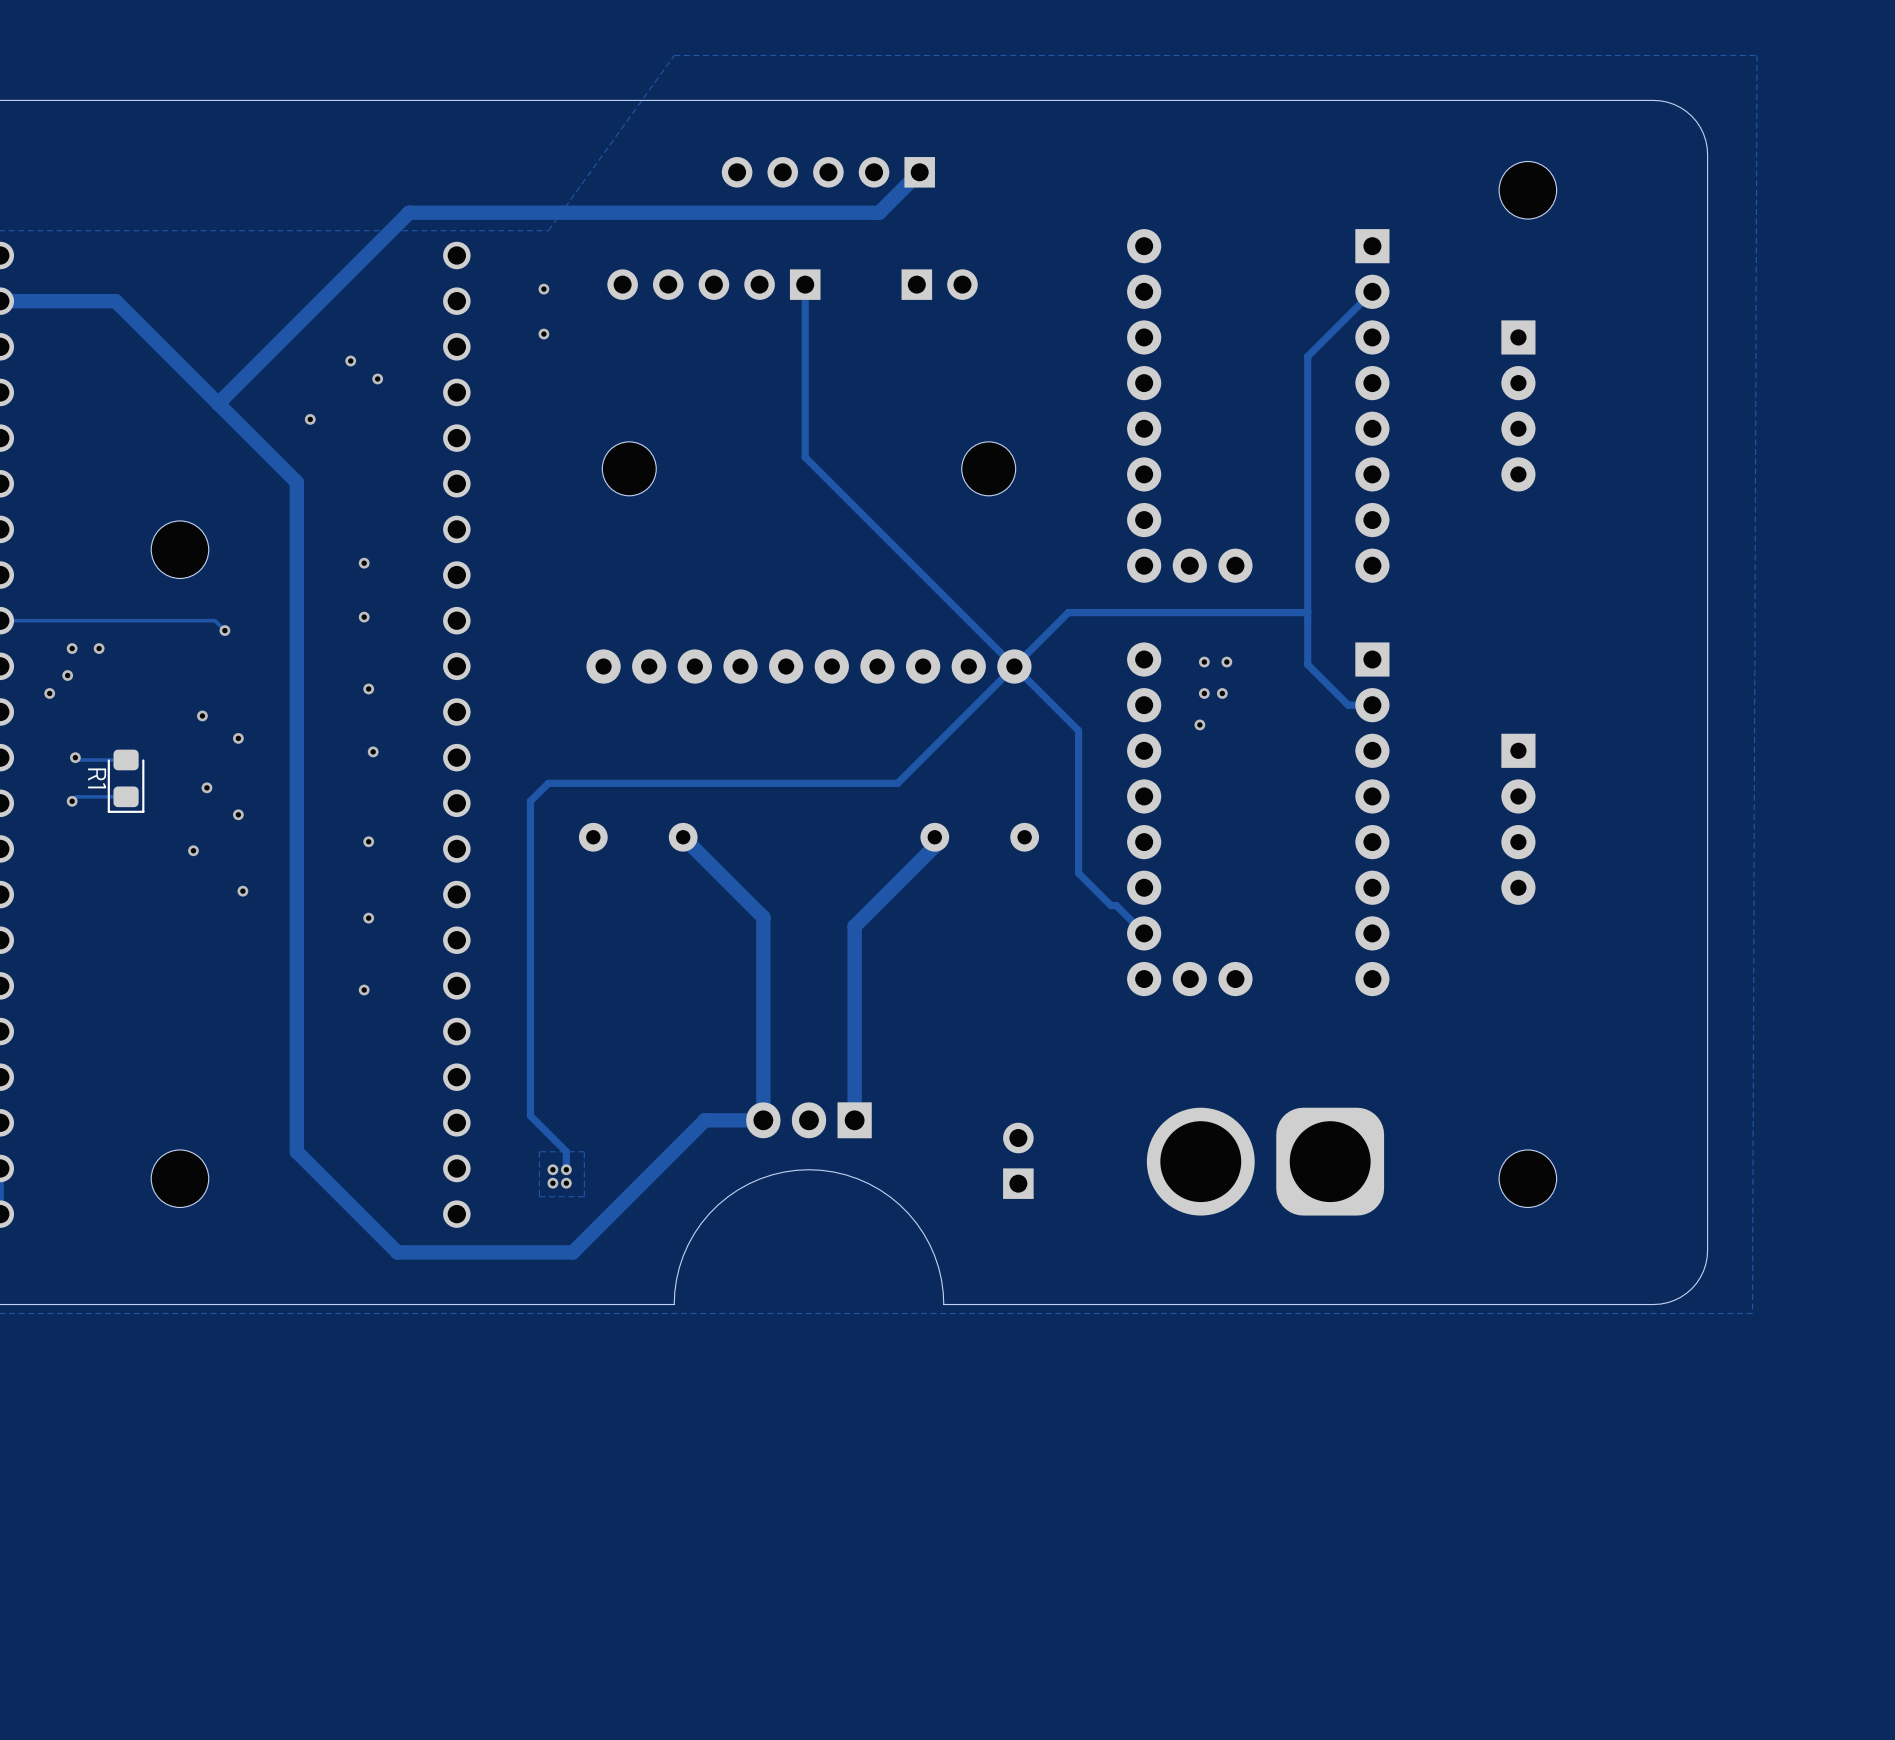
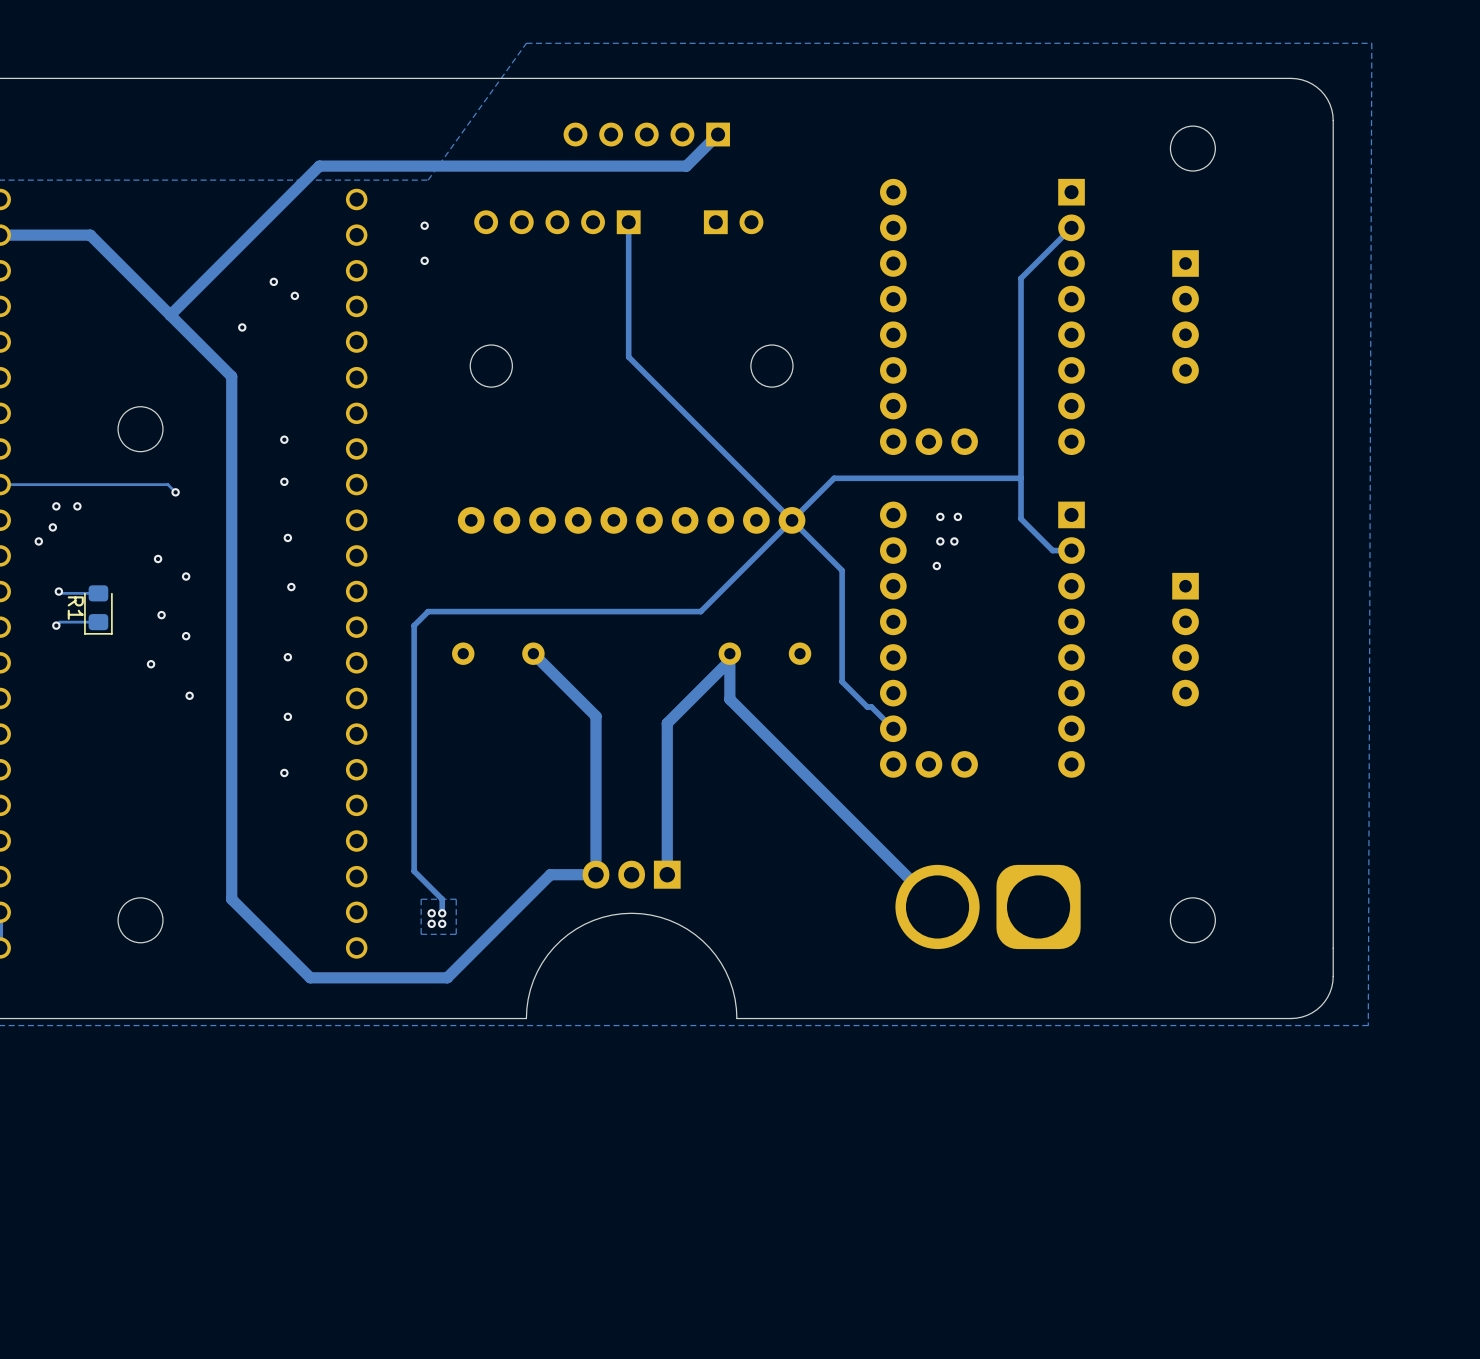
track: none -> (729, 660) (729, 699) (937, 906)
part: (1018, 1160) -> none

